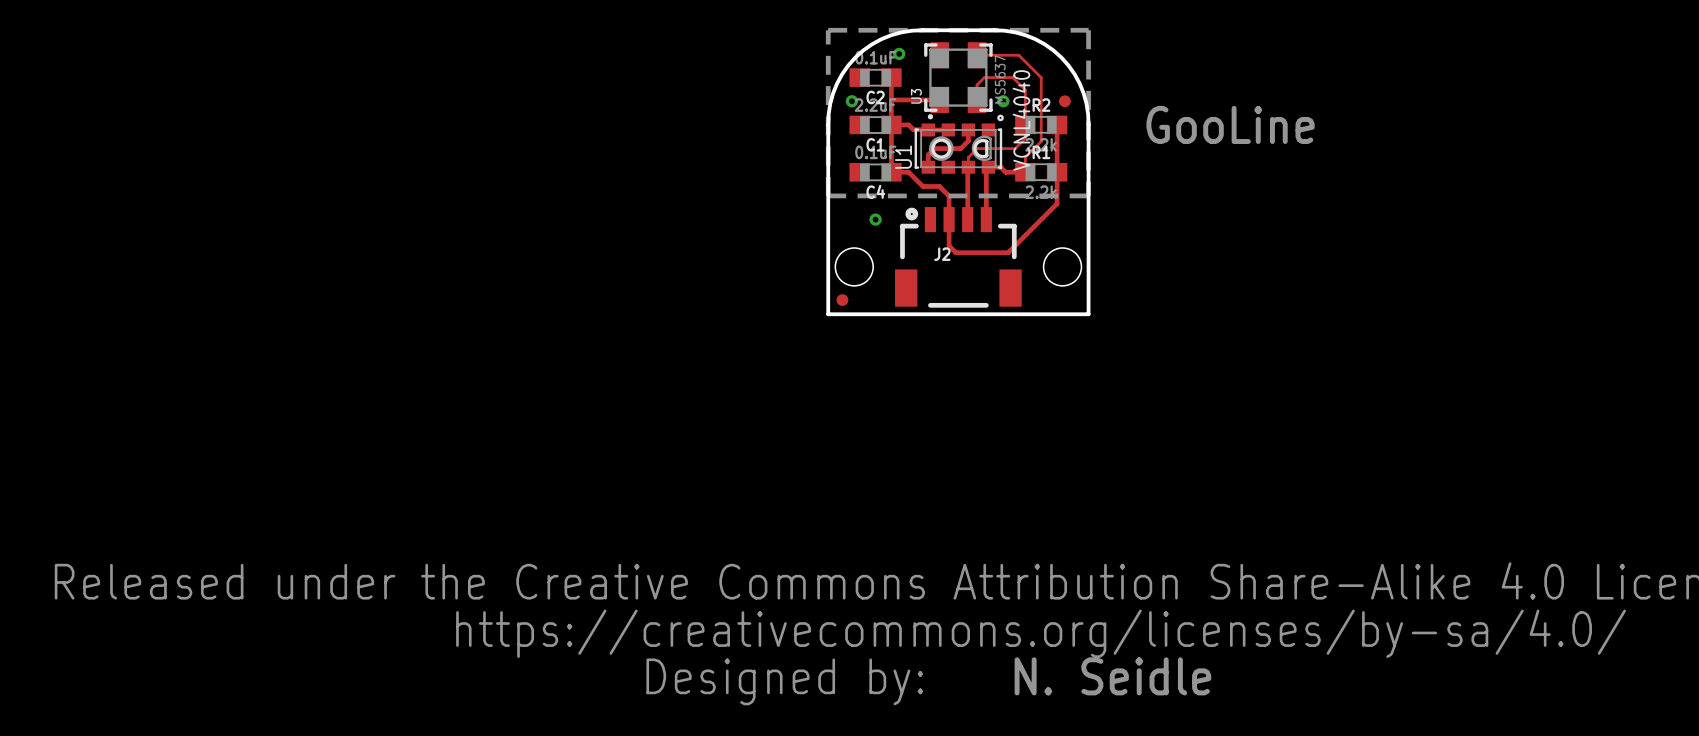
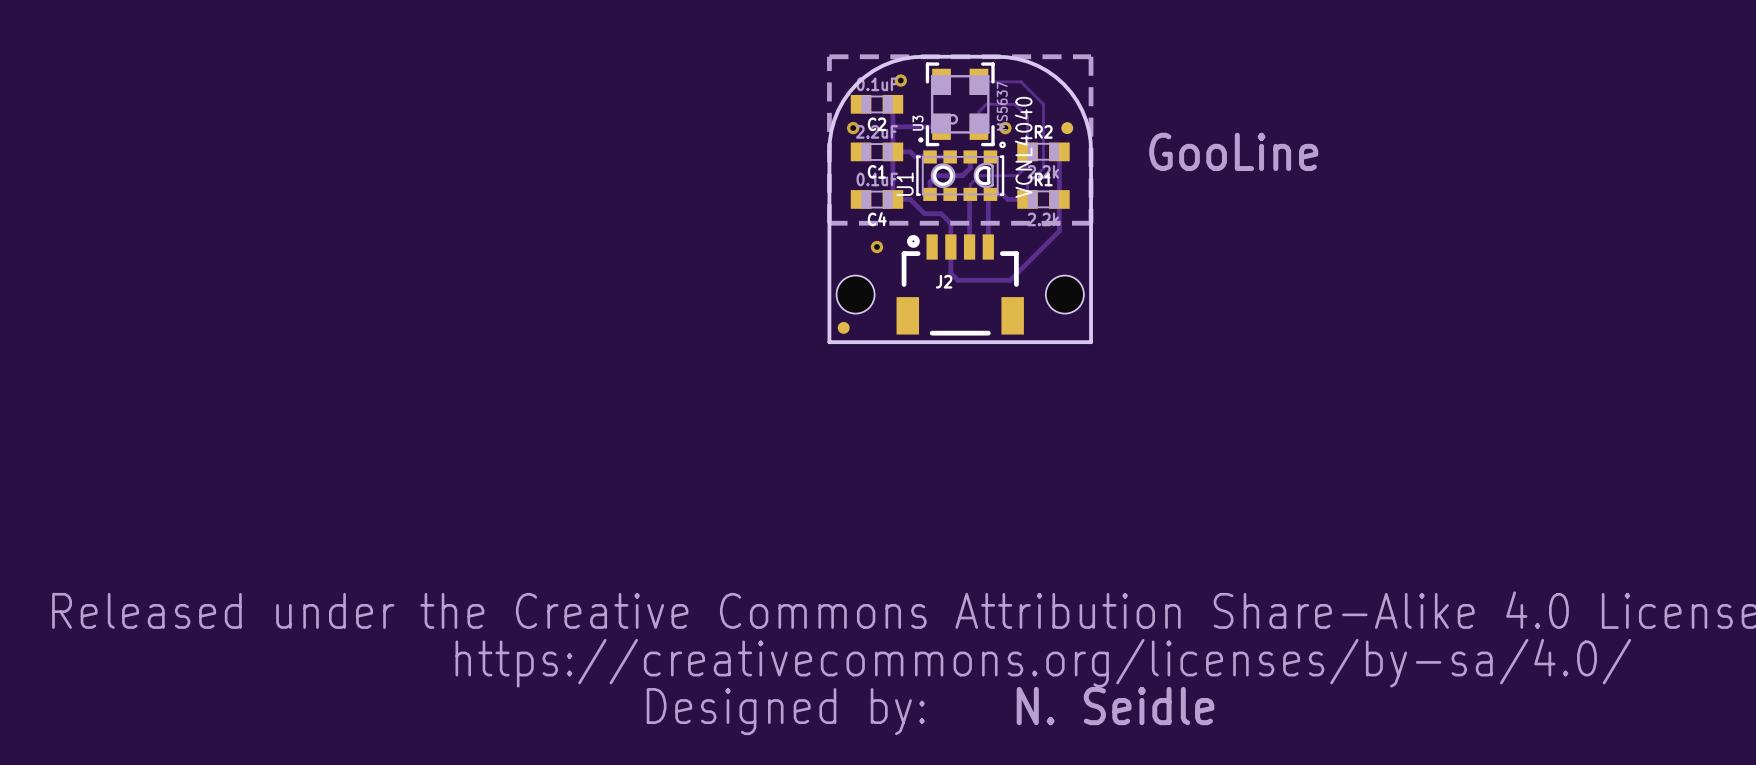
U3 footprint: [924, 42, 993, 120] -> [918, 62, 995, 147]

